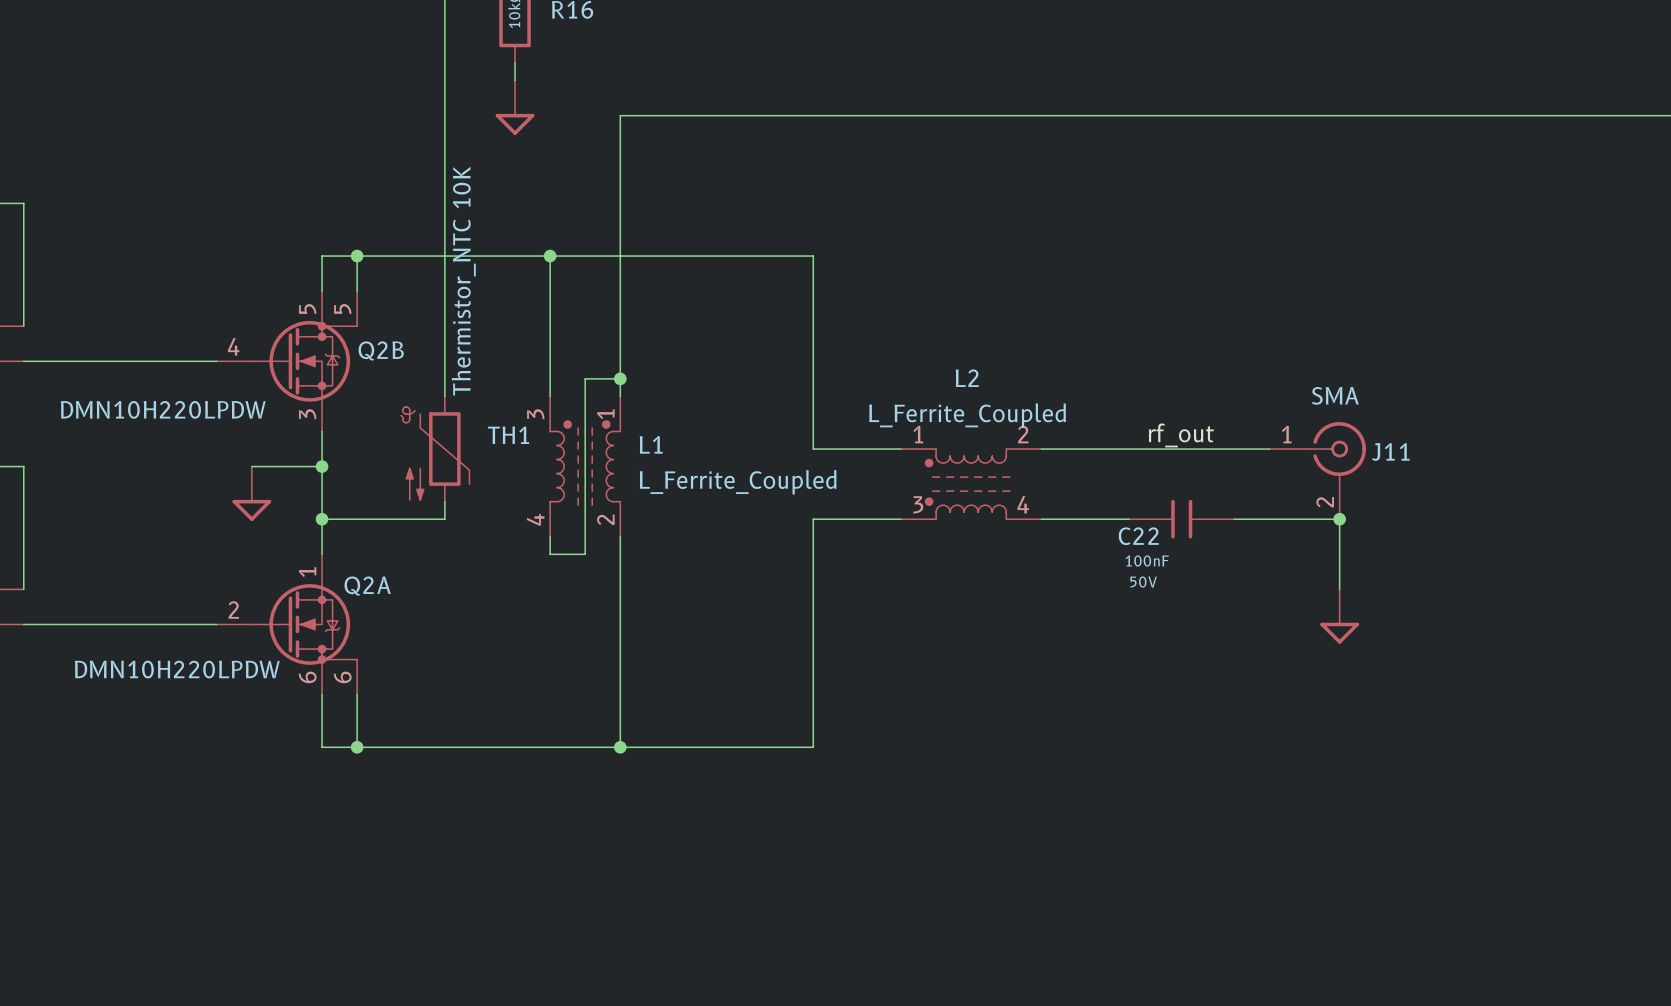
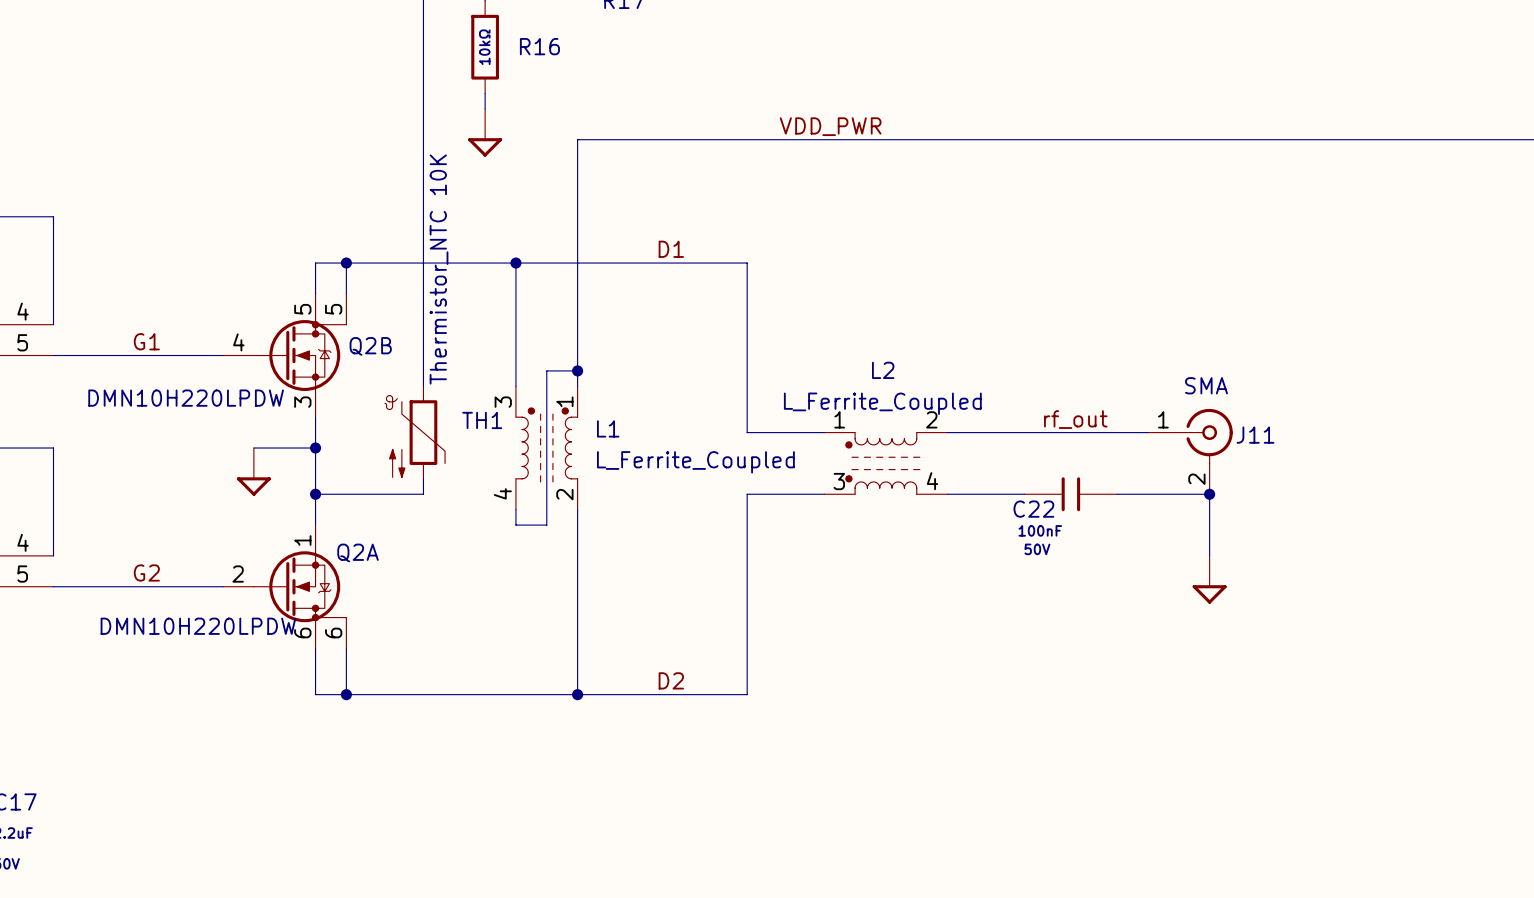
label: none -> VDD_PWR (830, 126)
label: none -> D1 (671, 249)
label: none -> G1 (146, 341)
label: none -> G2 (146, 572)
label: none -> D2 (671, 680)

